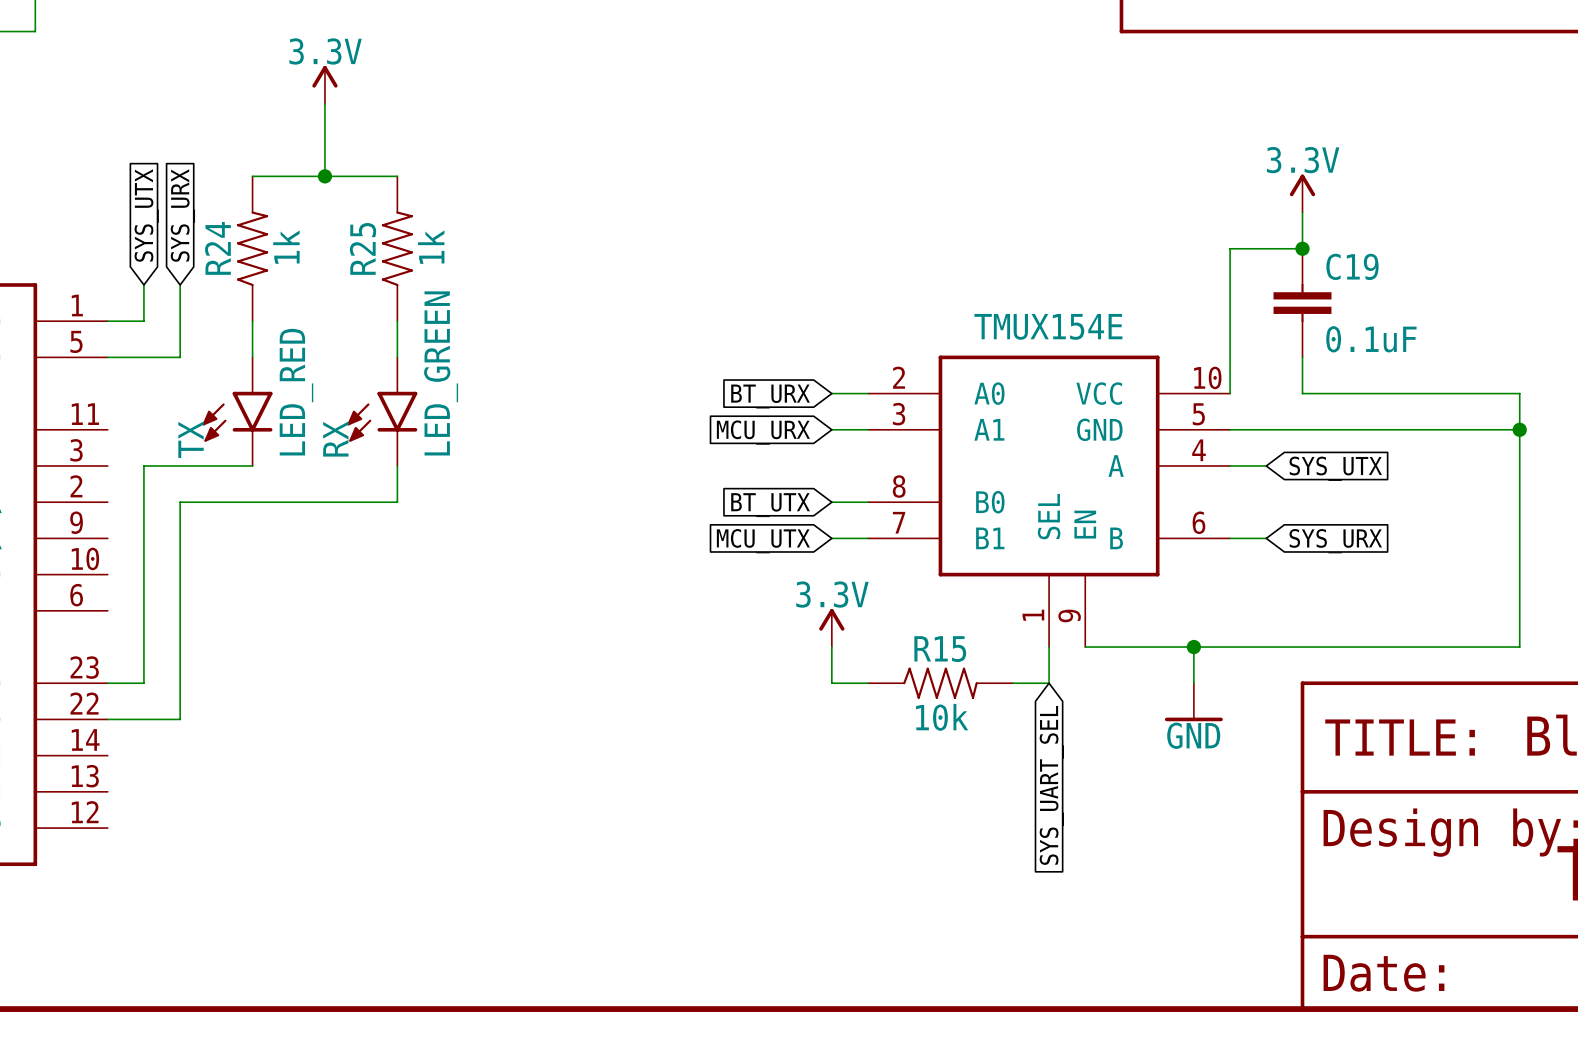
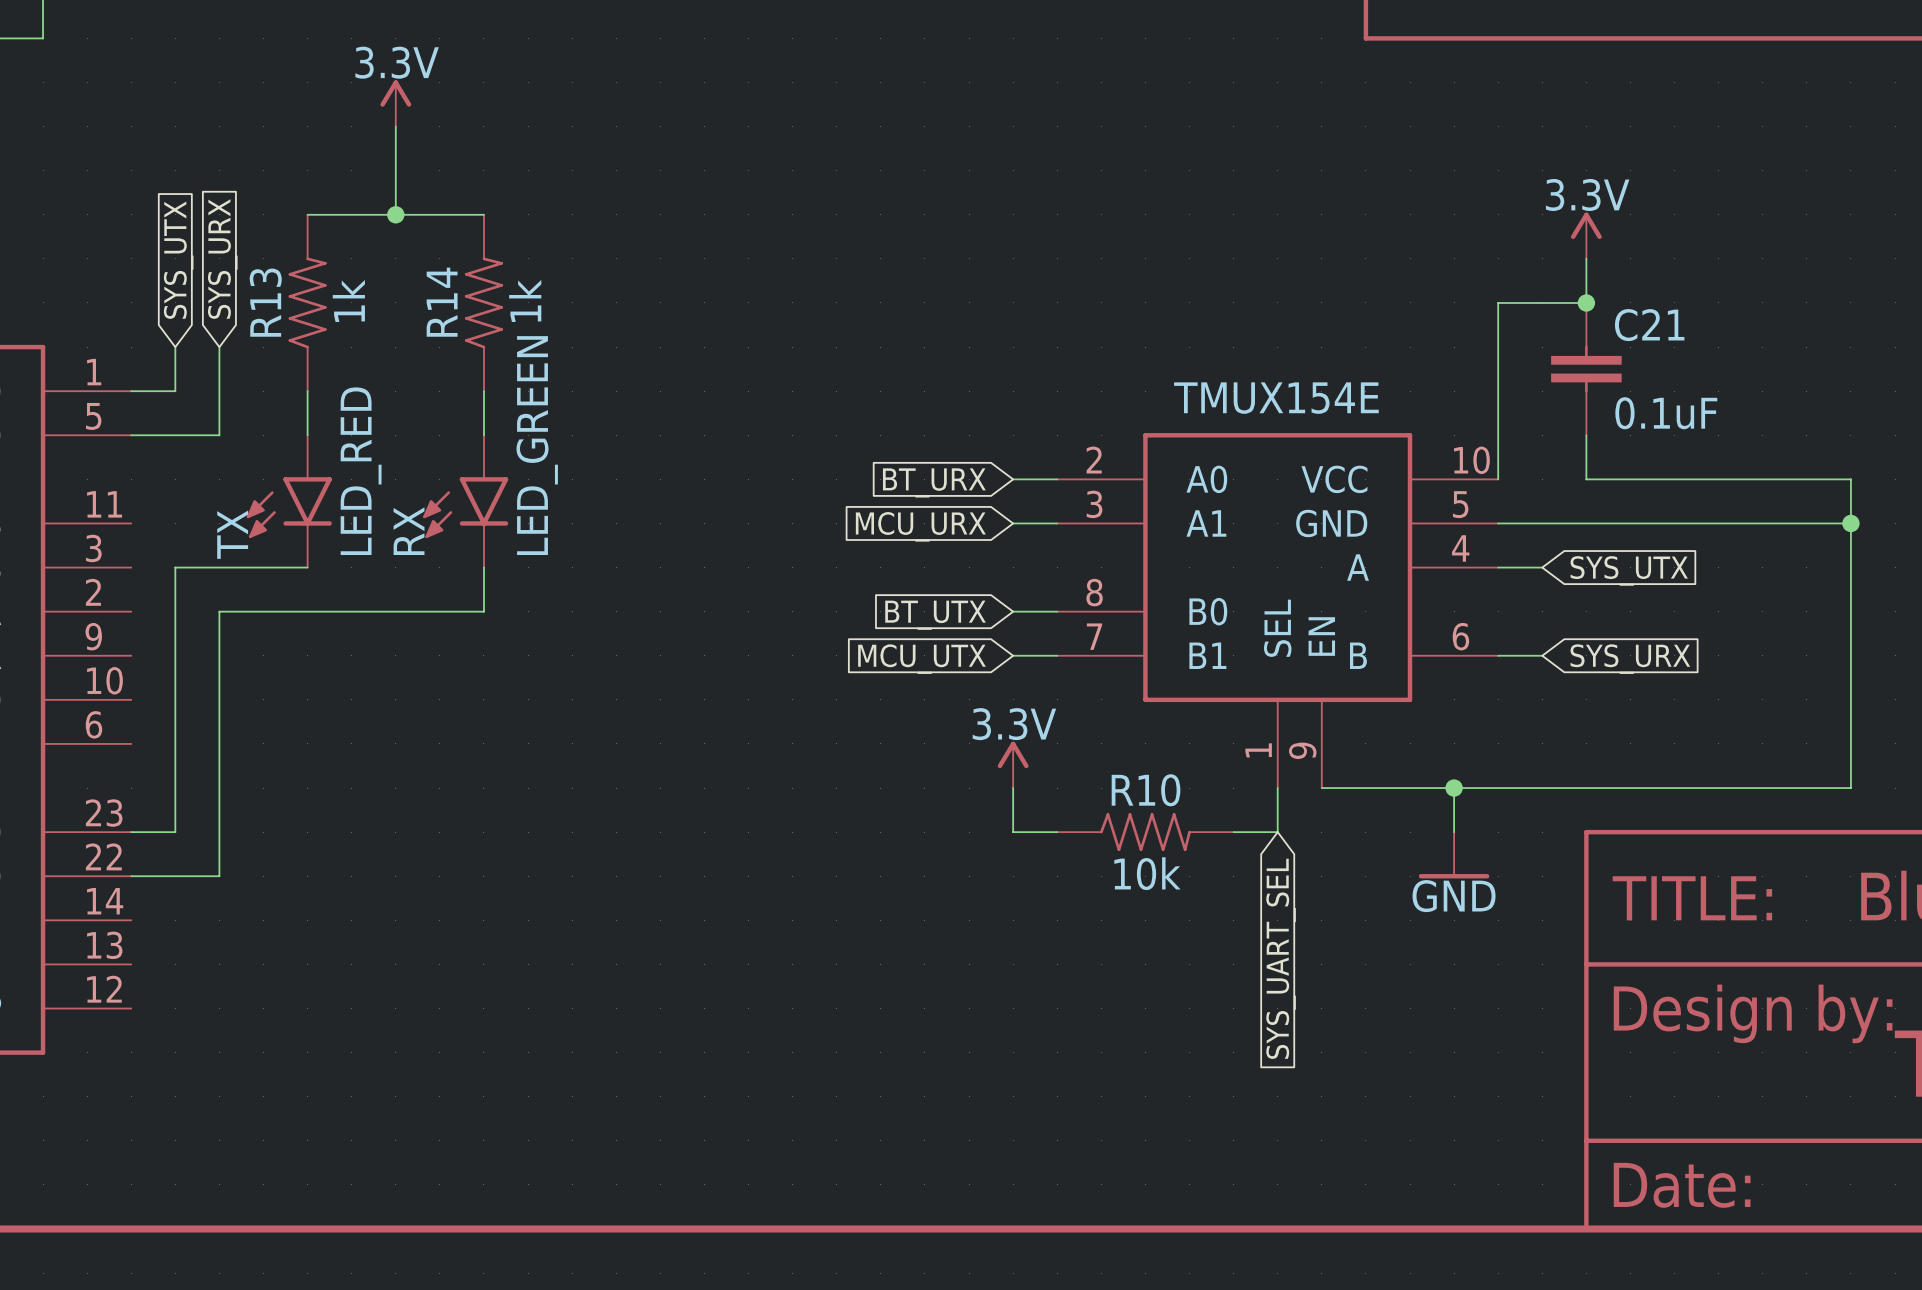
R24 name: R24 (217, 248) -> R13 (265, 302)
R25 name: R25 (363, 248) -> R14 (442, 302)
C19 name: C19 (1352, 266) -> C21 (1649, 325)
R15 name: R15 (940, 649) -> R10 (1146, 790)

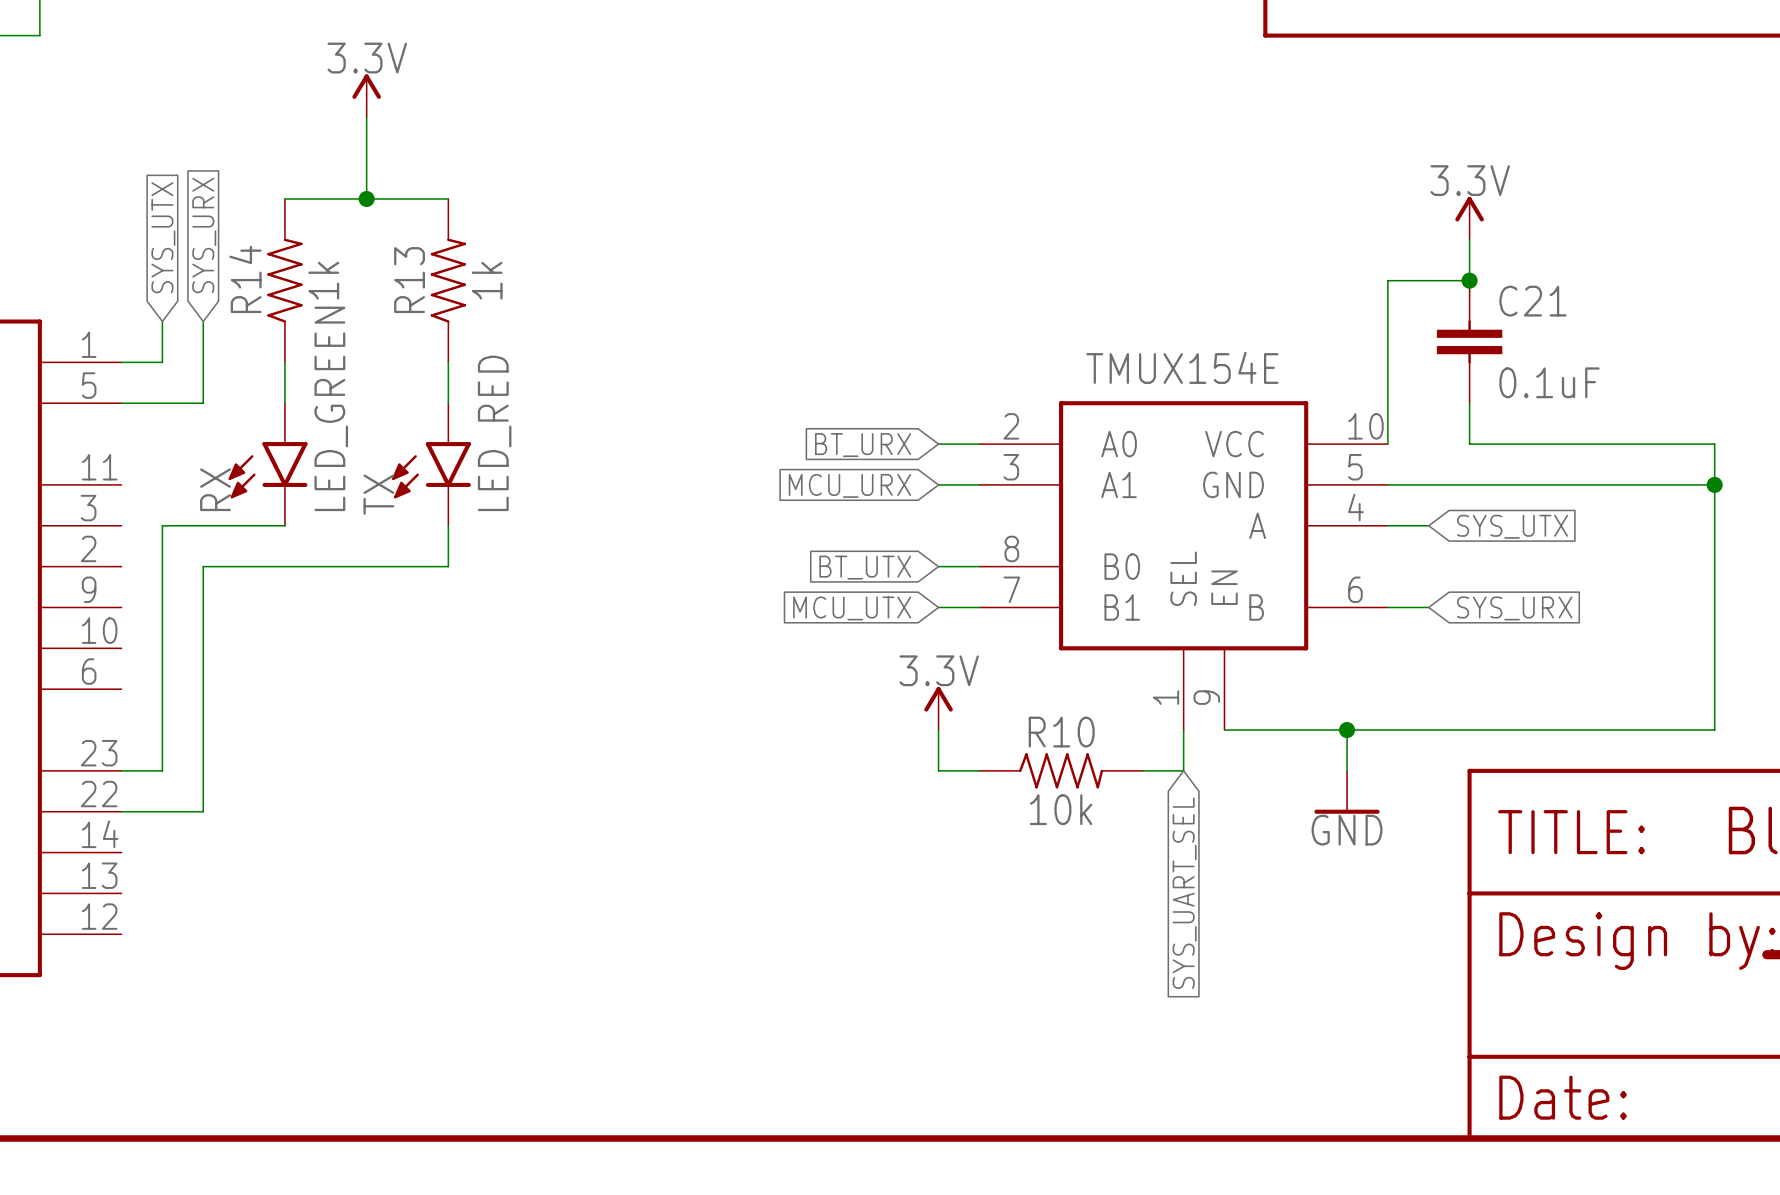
R13 name: R13 (265, 302) -> R14 (245, 279)
R14 name: R14 (442, 302) -> R13 (409, 280)
RX value: LED_GREEN (537, 445) -> LED_RED (494, 433)
TX value: LED_RED (361, 471) -> LED_GREEN (331, 408)
RX name: RX (409, 531) -> TX (378, 494)
TX name: TX (232, 534) -> RX (215, 489)

